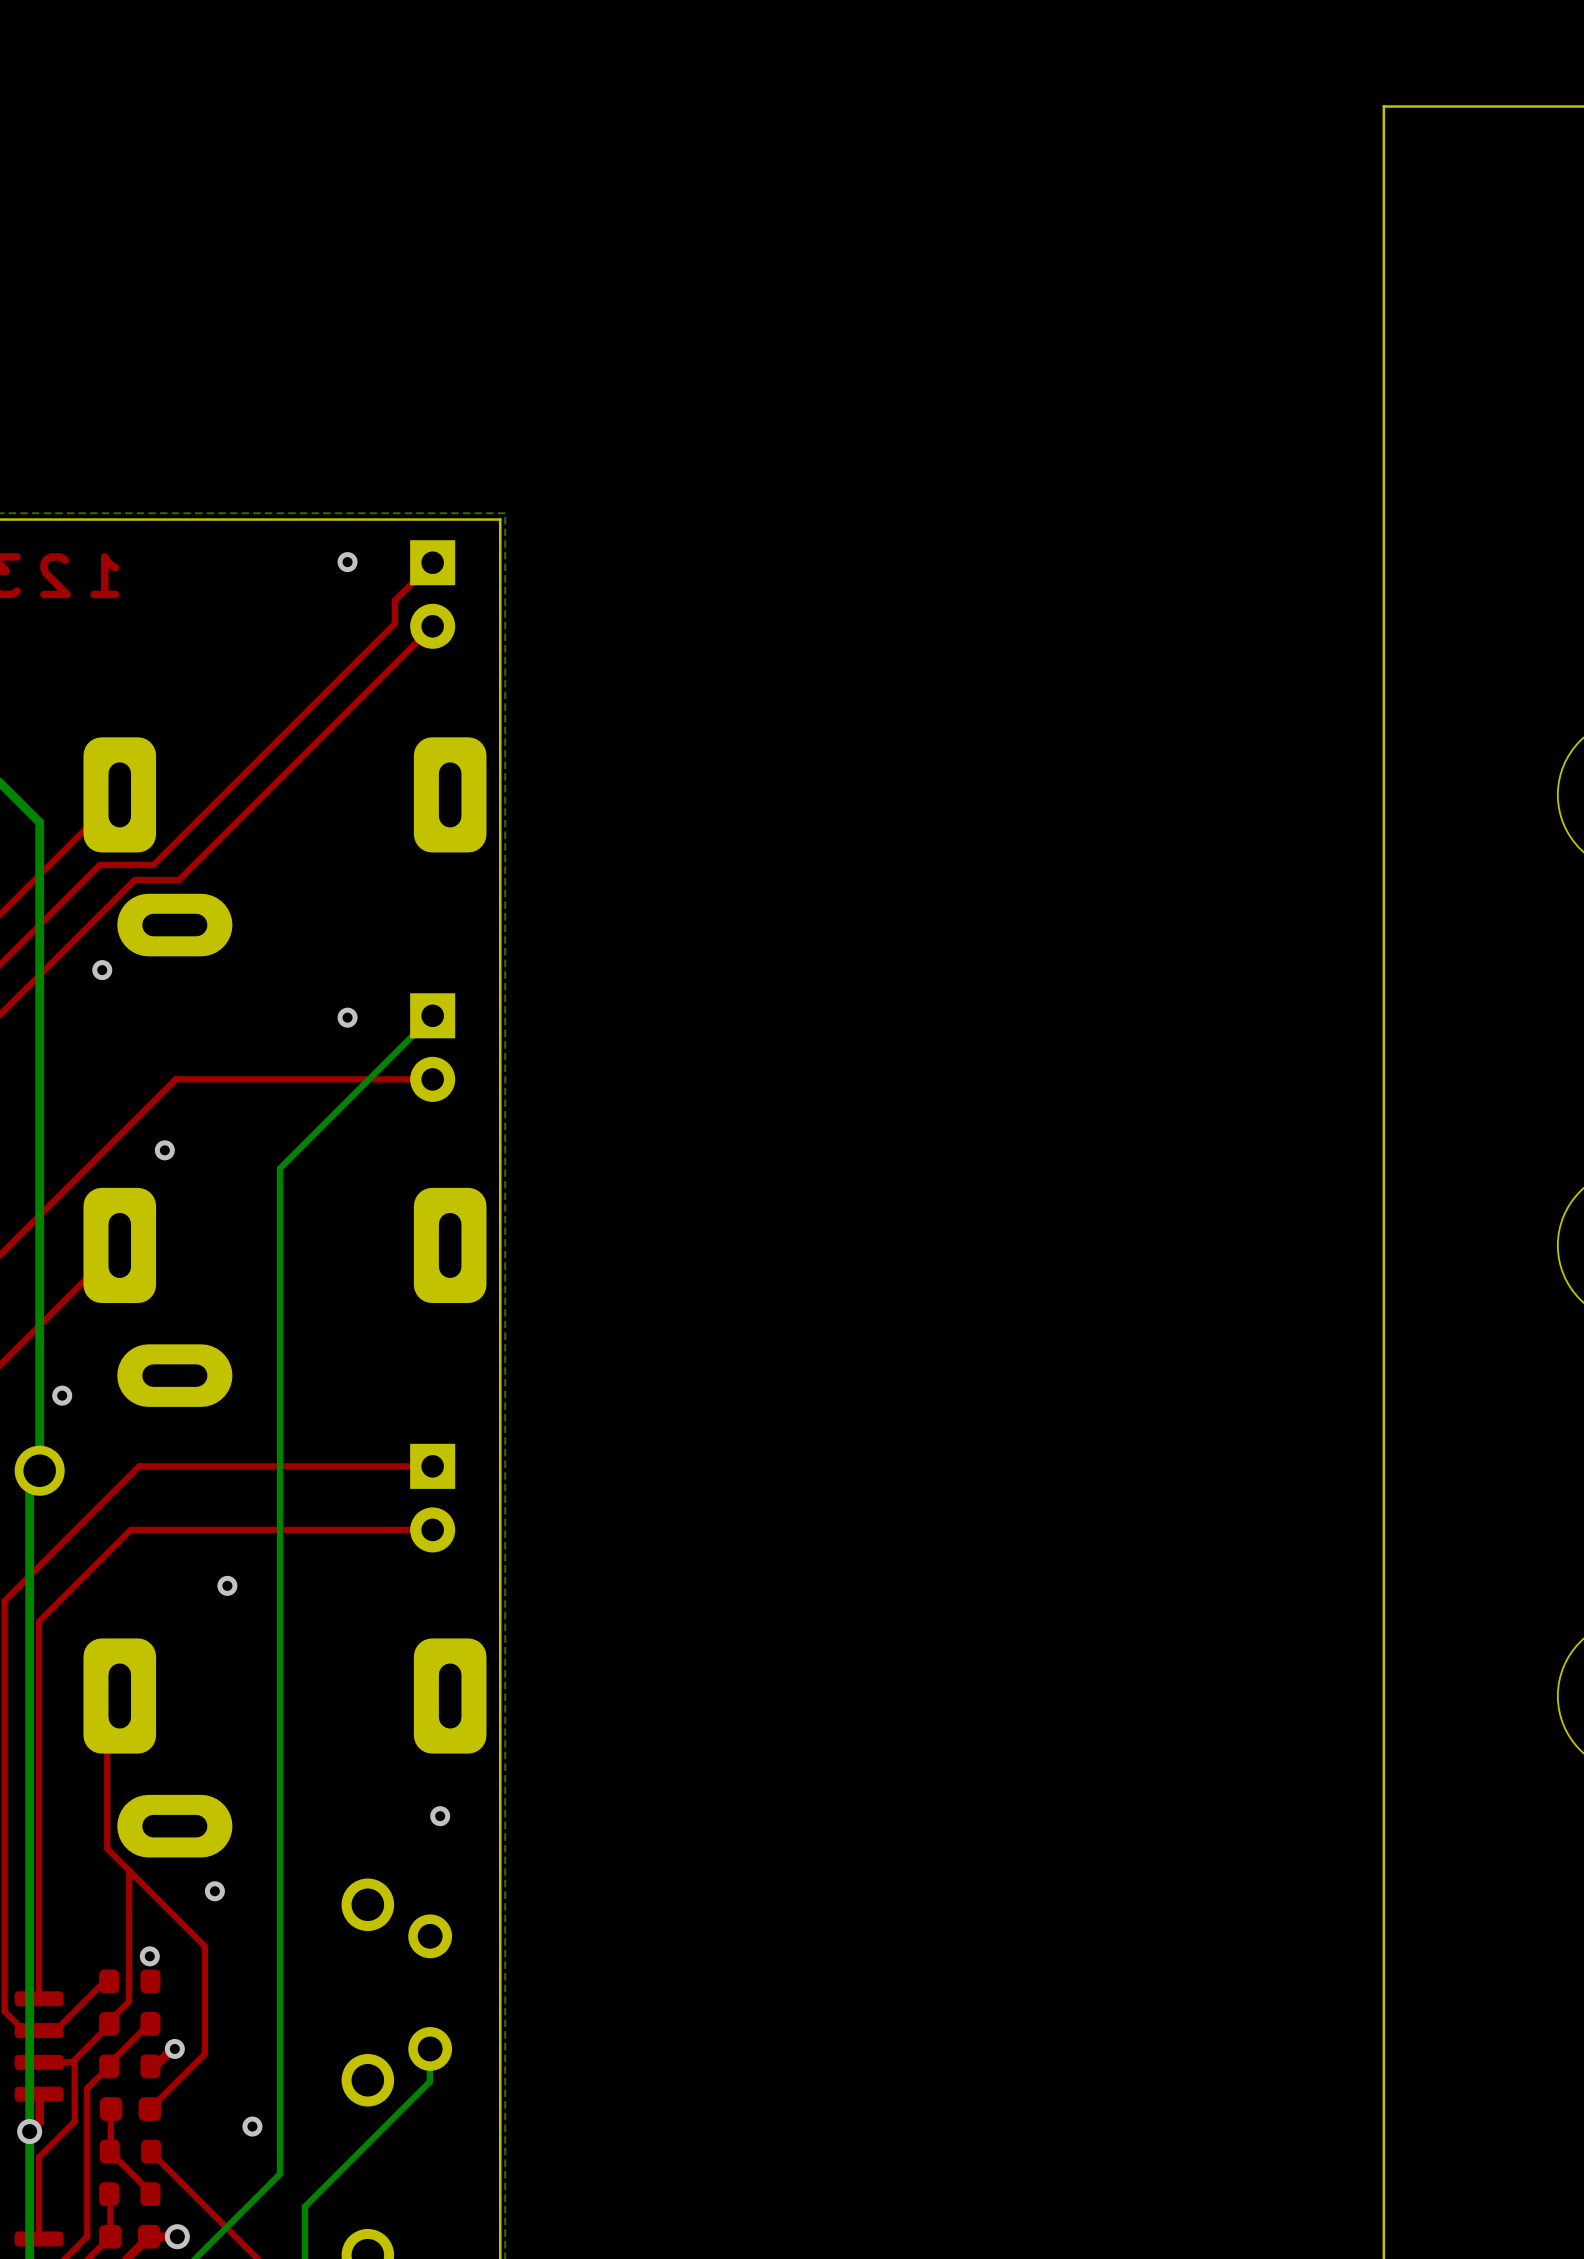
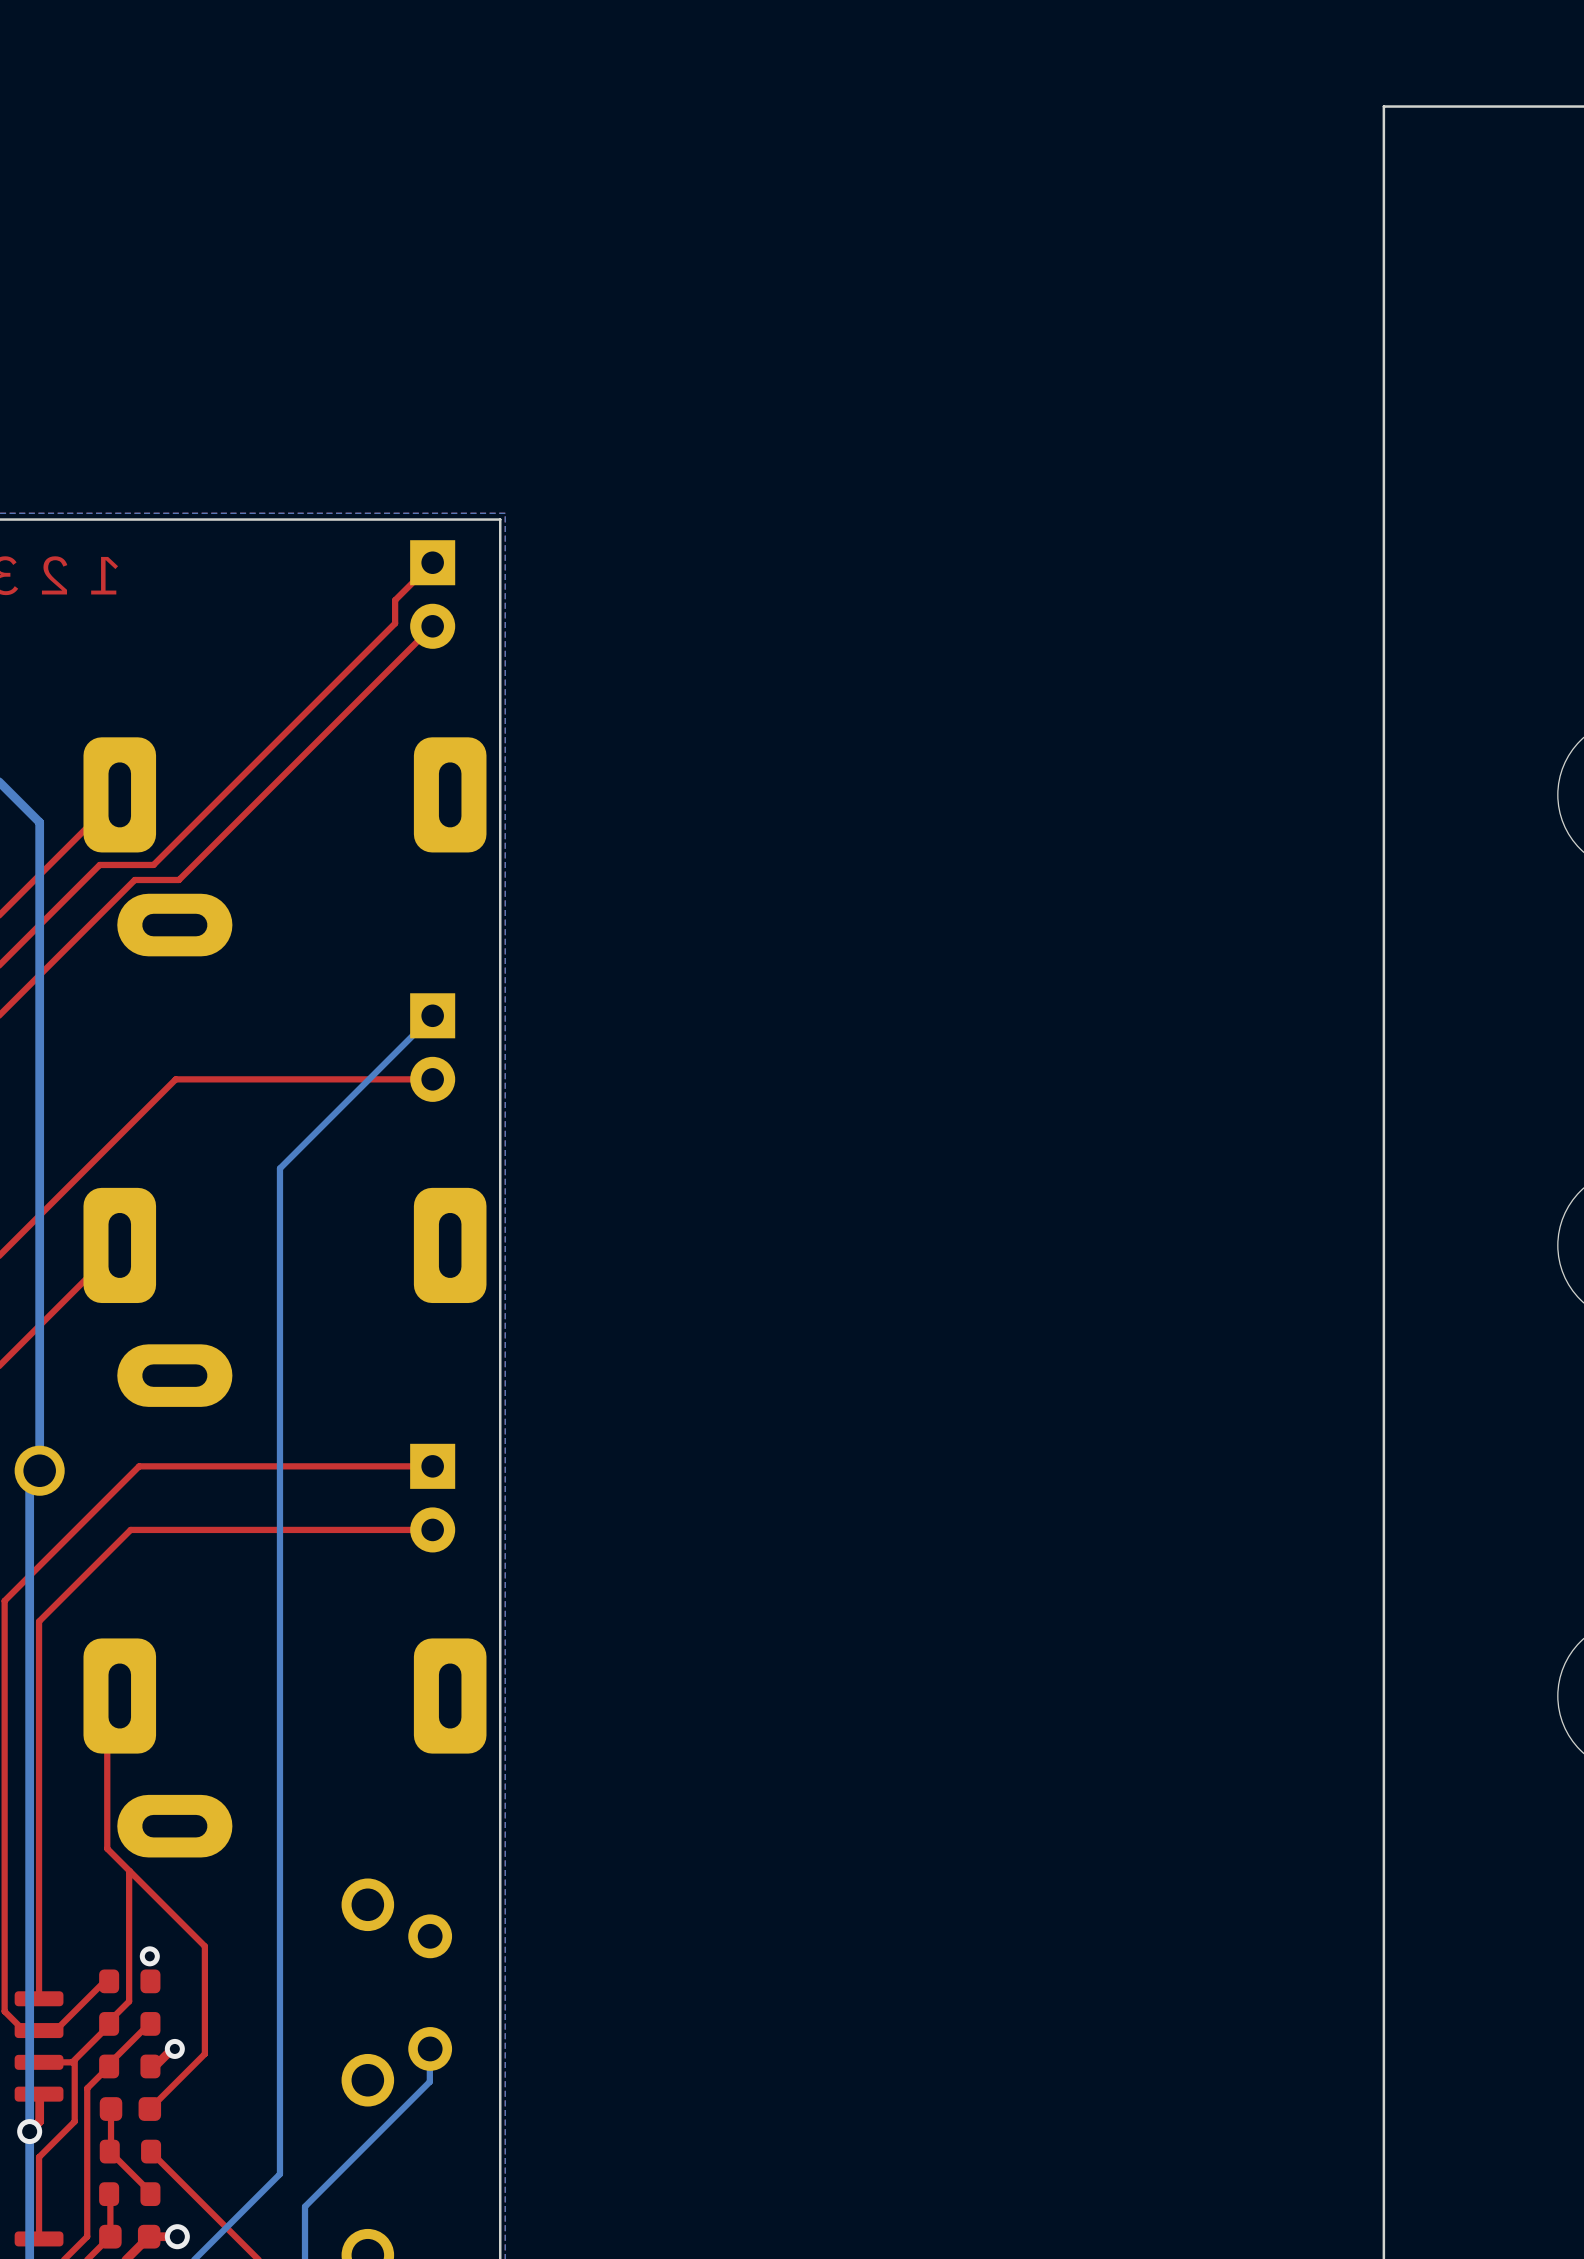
via: (347, 562) -> none
via: (102, 970) -> none
via: (347, 1017) -> none
via: (164, 1150) -> none
via: (62, 1395) -> none
via: (227, 1585) -> none
via: (440, 1816) -> none
via: (214, 1891) -> none
via: (252, 2126) -> none

